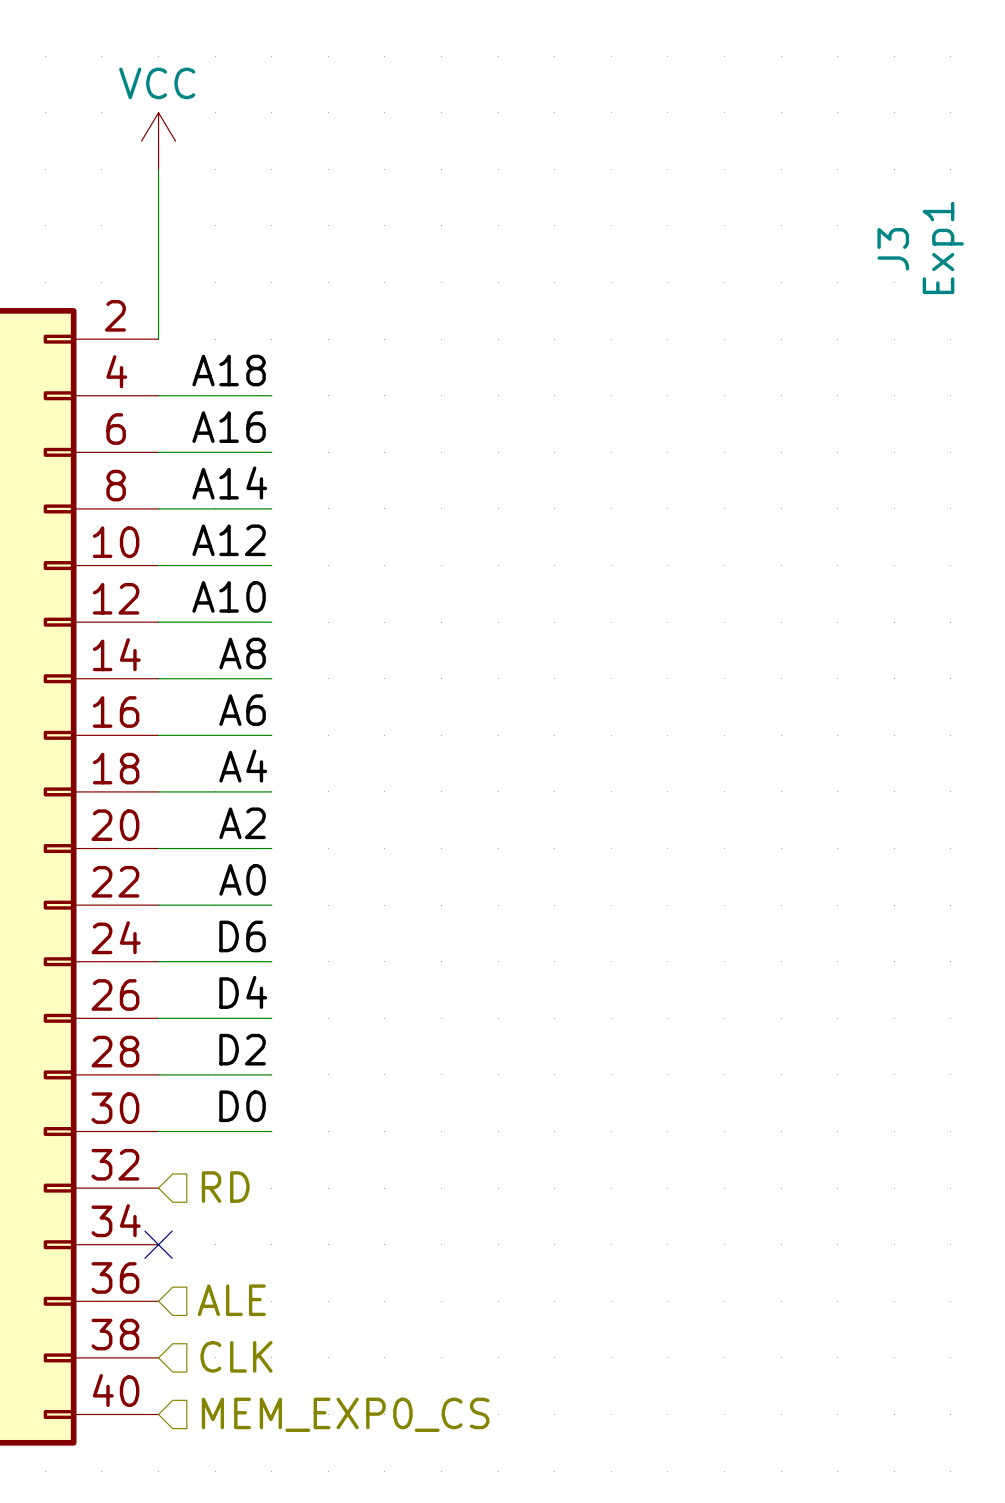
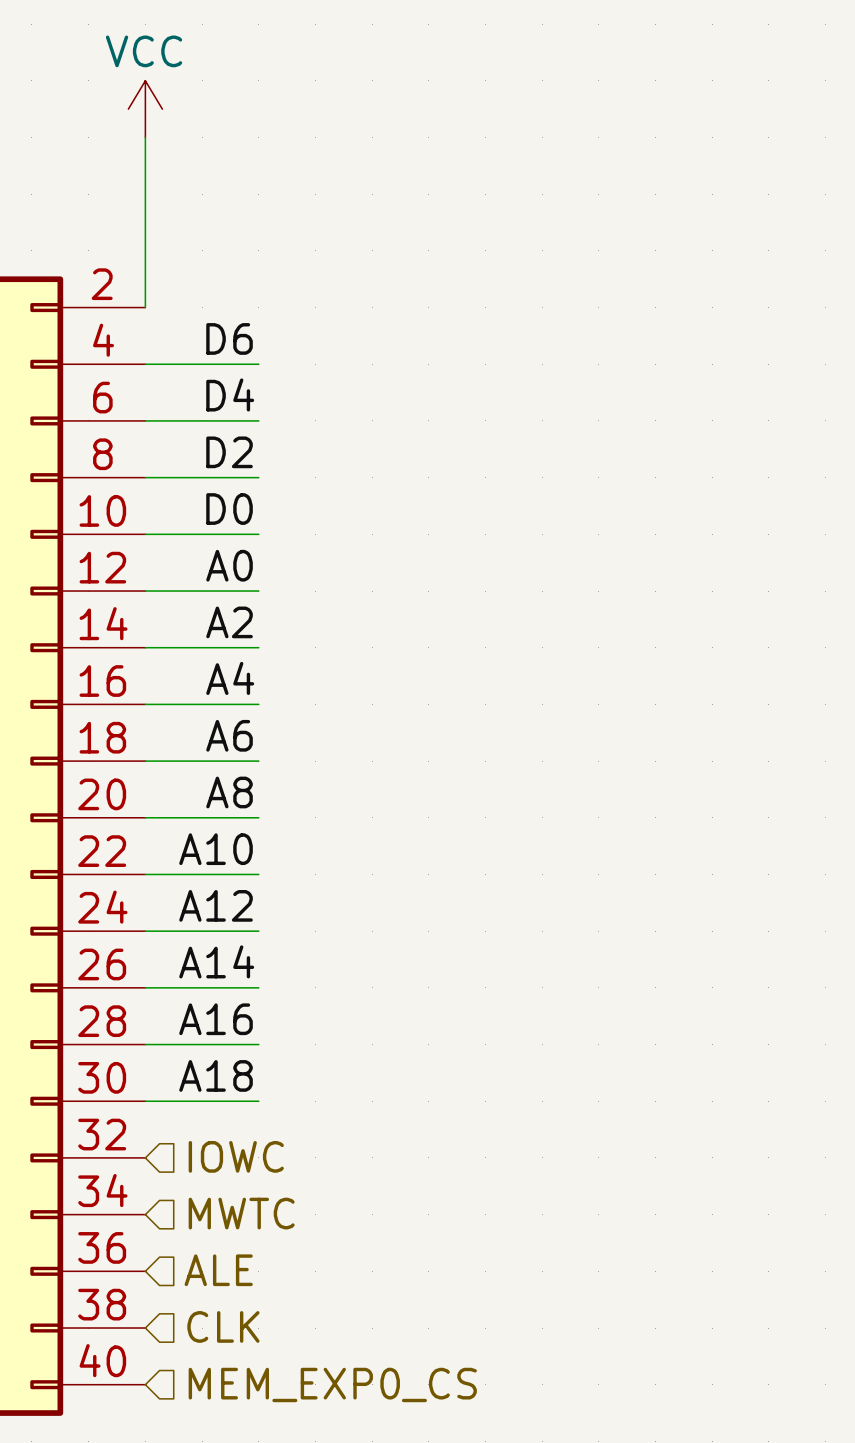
label: A18 (229, 370) -> D6 (229, 338)
label: A16 (229, 427) -> D4 (230, 394)
label: A14 (229, 483) -> D2 (229, 452)
label: A12 (229, 540) -> D0 (229, 509)
label: A10 (229, 596) -> A0 (229, 565)
label: A8 (242, 653) -> A2 (229, 622)
label: A6 (242, 710) -> A4 (230, 678)
label: A4 (243, 766) -> A6 (229, 735)
label: A2 (242, 823) -> A8 (229, 792)
label: A0 (242, 879) -> A10 (216, 849)
label: D6 (242, 936) -> A12 (216, 905)
label: D4 (243, 992) -> A14 (216, 961)
label: D2 (242, 1049) -> A16 (216, 1019)
label: D0 (242, 1106) -> A18 (216, 1075)
hierarchical label: RD (225, 1187) -> IOWC (236, 1156)
hierarchical label: none -> MWTC (241, 1213)
no-connect mark: (158, 1244) -> none

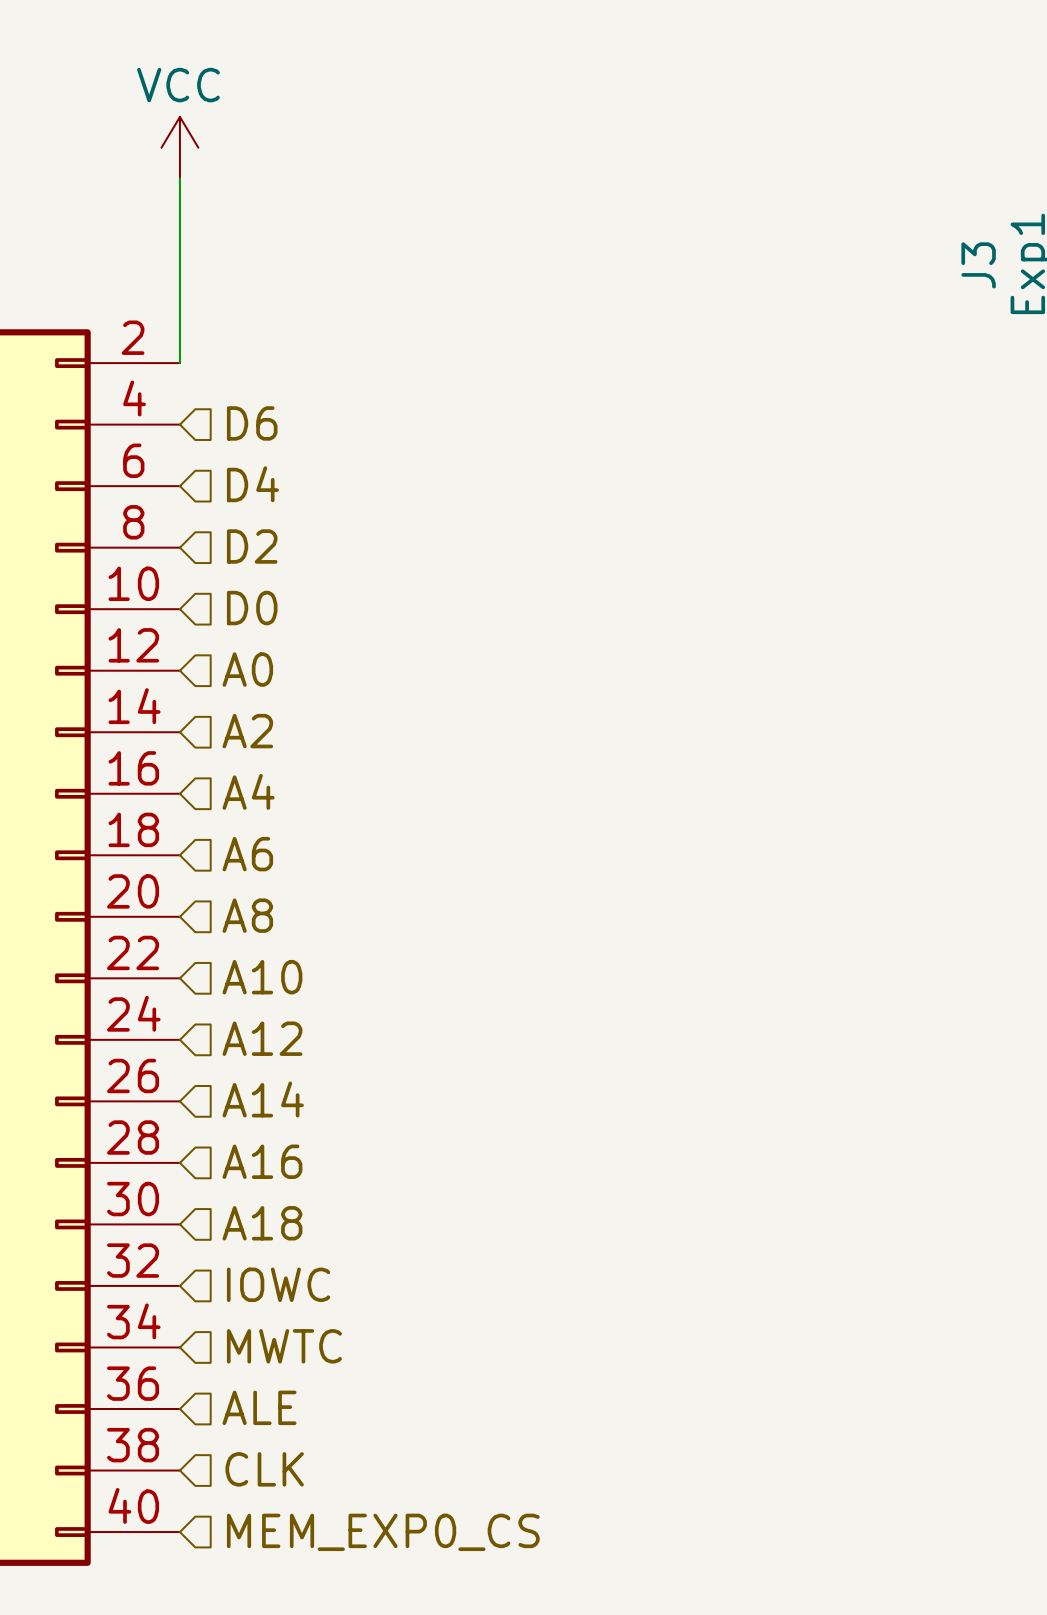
label: D6 (229, 338) -> none
hierarchical label: none -> D6 (252, 423)
wire: (145, 364) (258, 364) -> none
label: D4 (230, 394) -> none
hierarchical label: none -> D4 (252, 484)
wire: (145, 420) (258, 420) -> none
label: D2 (229, 452) -> none
hierarchical label: none -> D2 (252, 546)
wire: (145, 477) (258, 477) -> none
label: D0 (229, 509) -> none
hierarchical label: none -> D0 (252, 608)
wire: (145, 534) (258, 534) -> none
label: A0 (229, 565) -> none
hierarchical label: none -> A0 (247, 669)
wire: (145, 591) (258, 591) -> none
label: A2 (229, 622) -> none
hierarchical label: none -> A2 (247, 731)
wire: (145, 647) (258, 647) -> none
label: A4 (230, 678) -> none
hierarchical label: none -> A4 (248, 791)
wire: (145, 704) (258, 704) -> none
label: A6 (229, 735) -> none
hierarchical label: none -> A6 (247, 854)
wire: (145, 761) (258, 761) -> none
label: A8 (229, 792) -> none
hierarchical label: none -> A8 (247, 915)
wire: (145, 817) (258, 817) -> none
label: A10 (216, 849) -> none
hierarchical label: none -> A10 (262, 977)
wire: (145, 874) (258, 874) -> none
label: A12 (216, 905) -> none
hierarchical label: none -> A12 (262, 1038)
wire: (145, 931) (258, 931) -> none
label: A14 (216, 961) -> none
hierarchical label: none -> A14 (263, 1099)
wire: (145, 987) (258, 987) -> none
label: A16 (216, 1019) -> none
hierarchical label: none -> A16 (262, 1161)
wire: (145, 1044) (258, 1044) -> none
label: A18 (216, 1075) -> none
hierarchical label: none -> A18 (262, 1223)
wire: (145, 1101) (258, 1101) -> none

